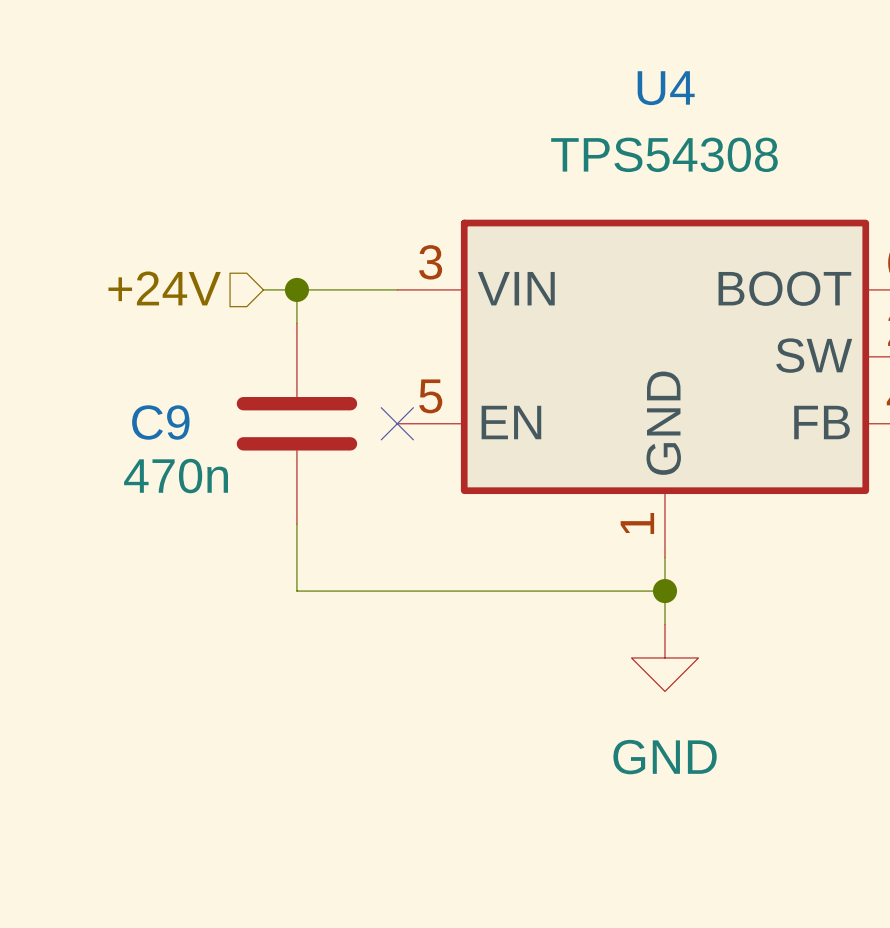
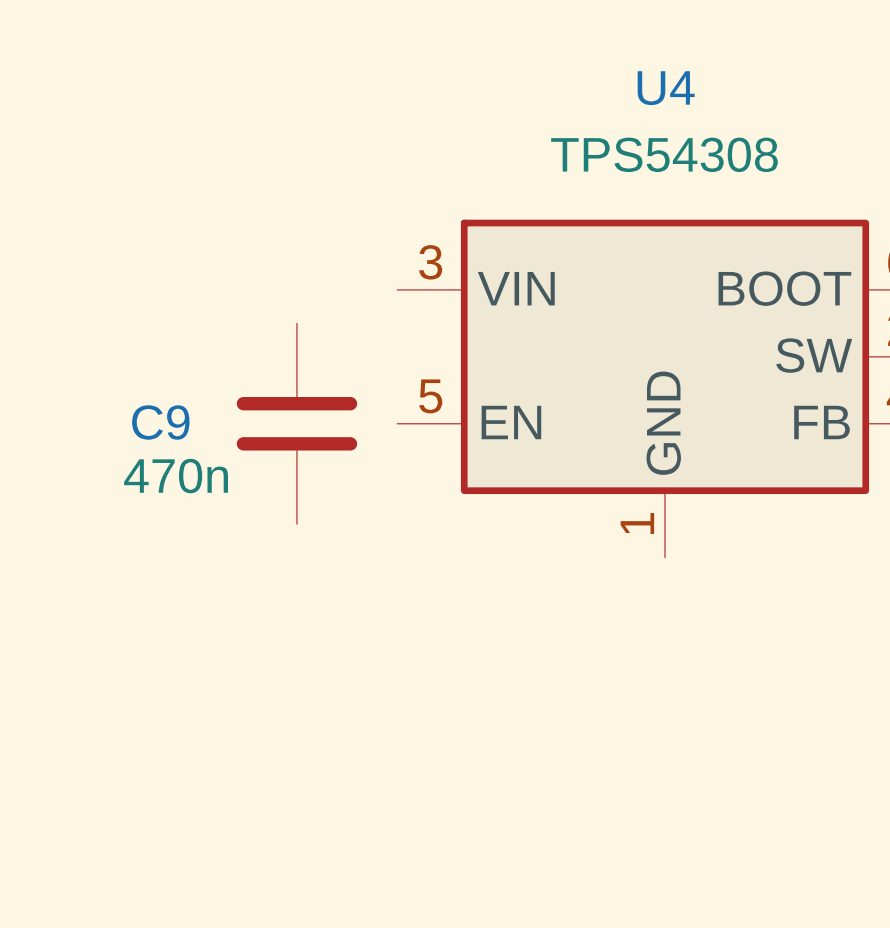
hierarchical label: +24V (164, 288) -> none
wire: (263, 289) (397, 289) -> none
wire: (296, 289) (296, 323) -> none
junction: (296, 289) -> none
no-connect mark: (397, 423) -> none
wire: (296, 524) (296, 591) (664, 591) -> none
wire: (664, 557) (664, 624) -> none
junction: (664, 591) -> none
power symbol: GND (664, 657) -> none

